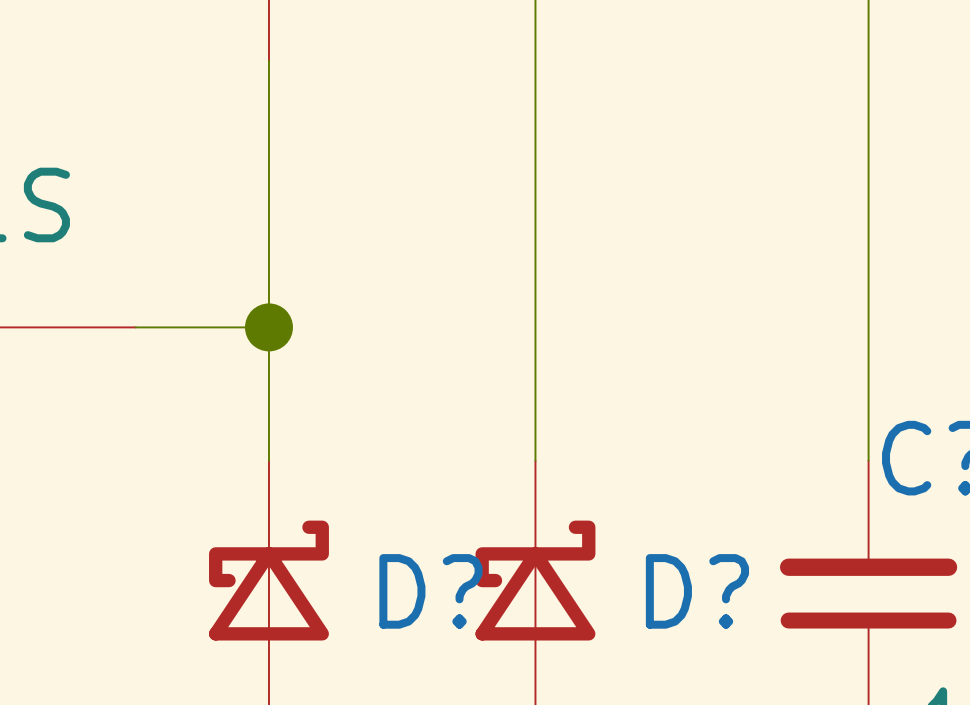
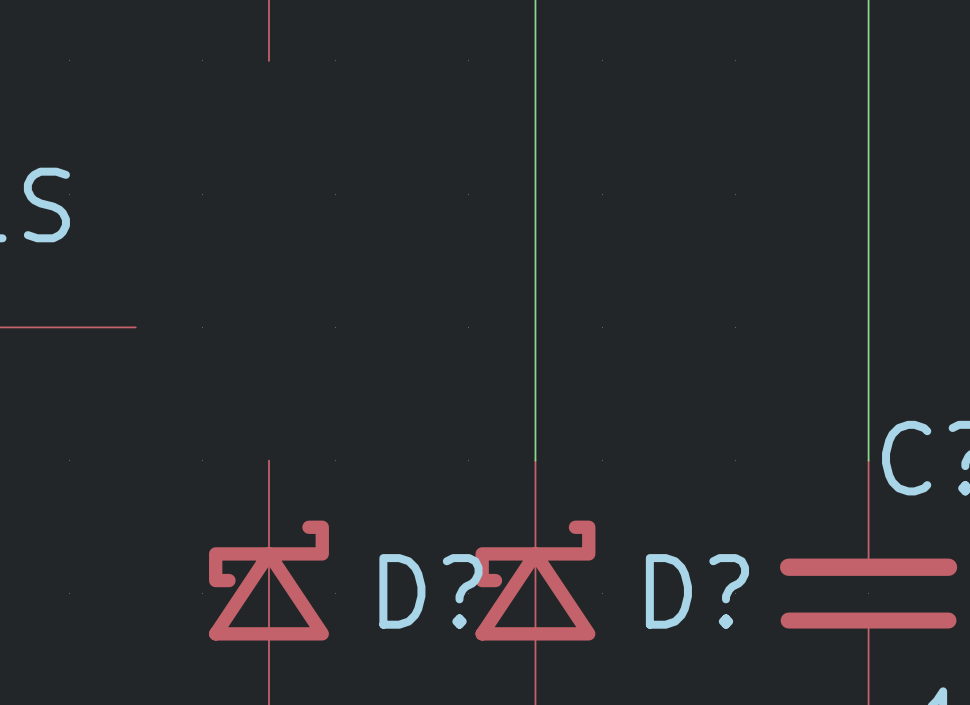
wire: (268, 60) (268, 460) -> none
wire: (135, 327) (268, 327) -> none
junction: (268, 327) -> none

